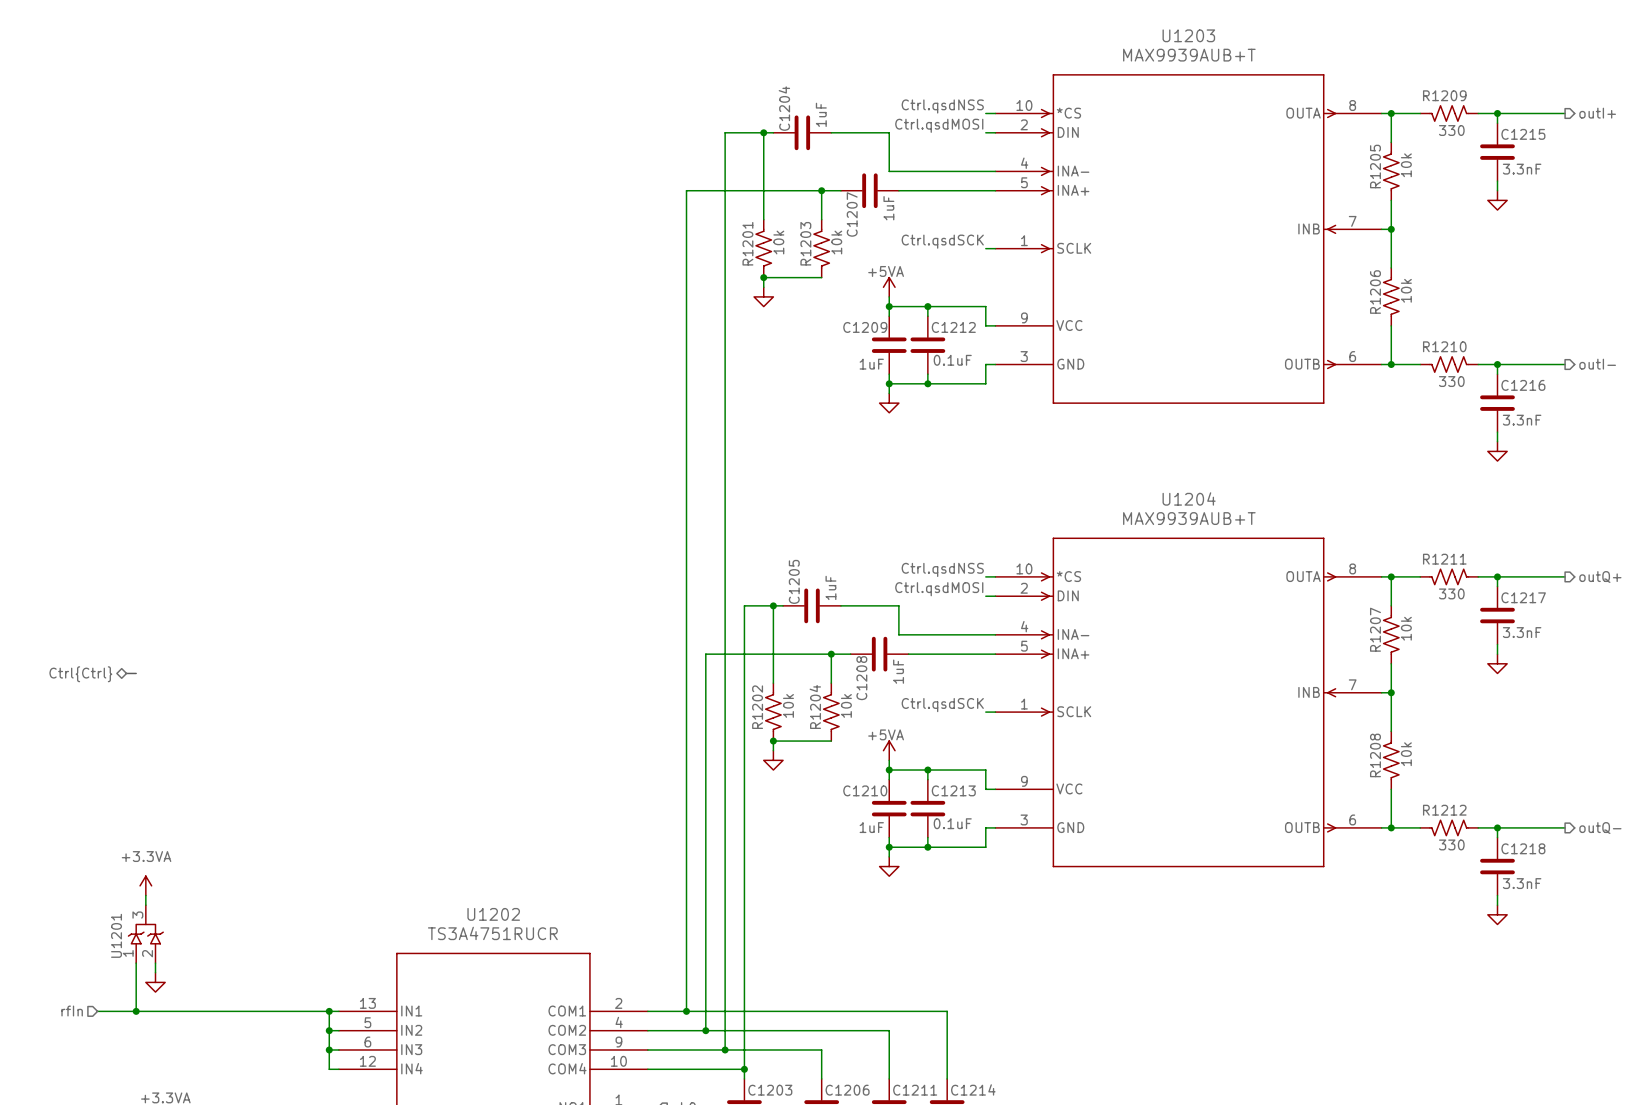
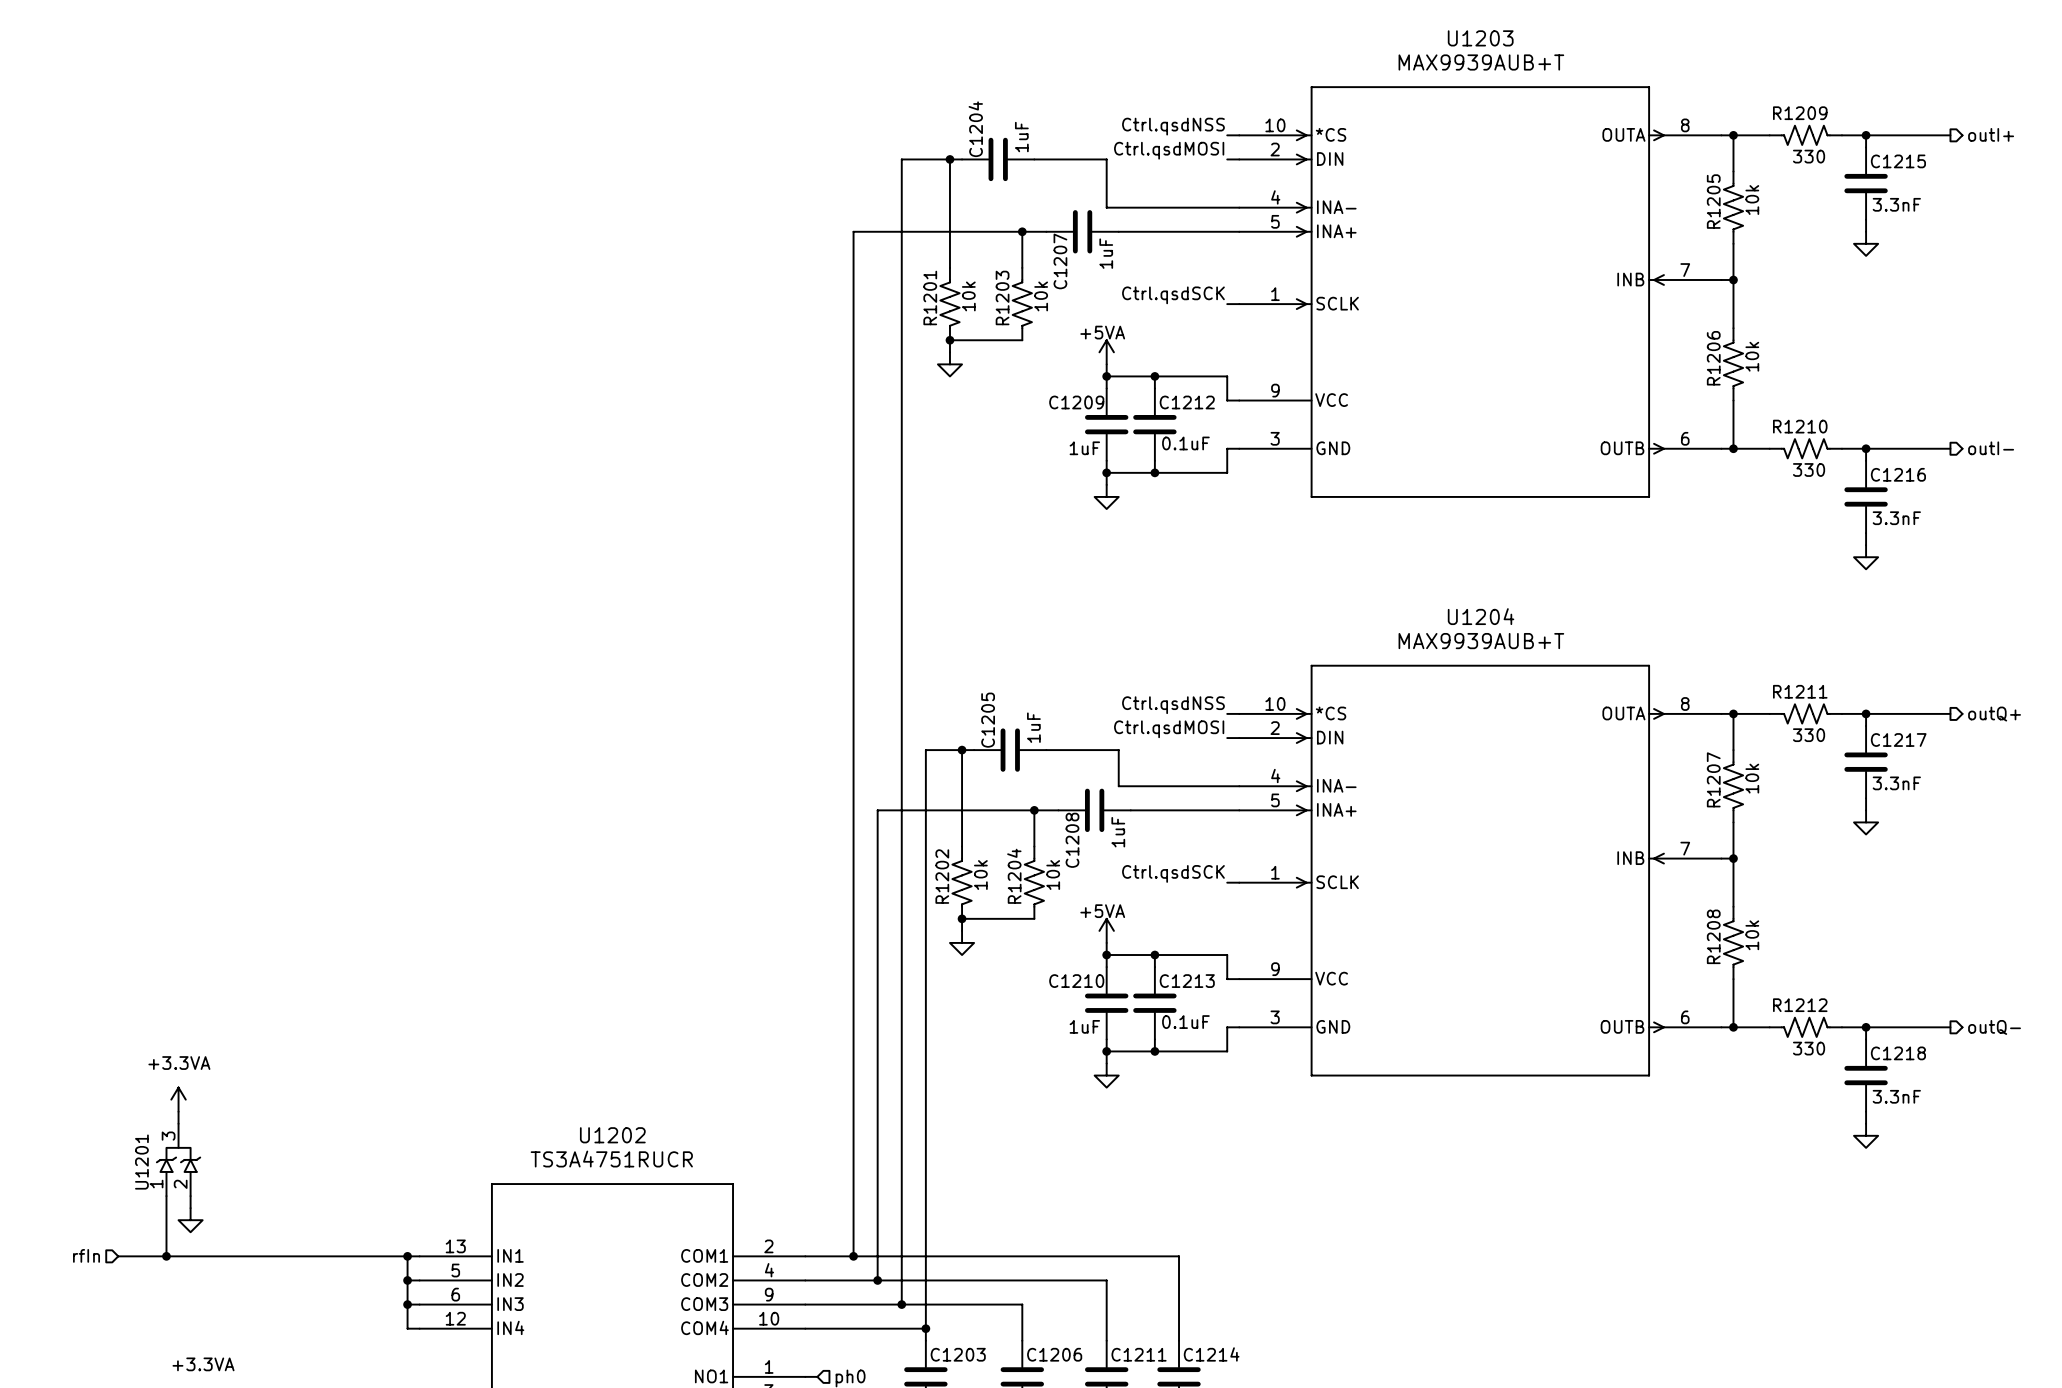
bus: (126, 673) (136, 673) -> none
hierarchical label: Ctrl{Ctrl} (80, 674) -> none

